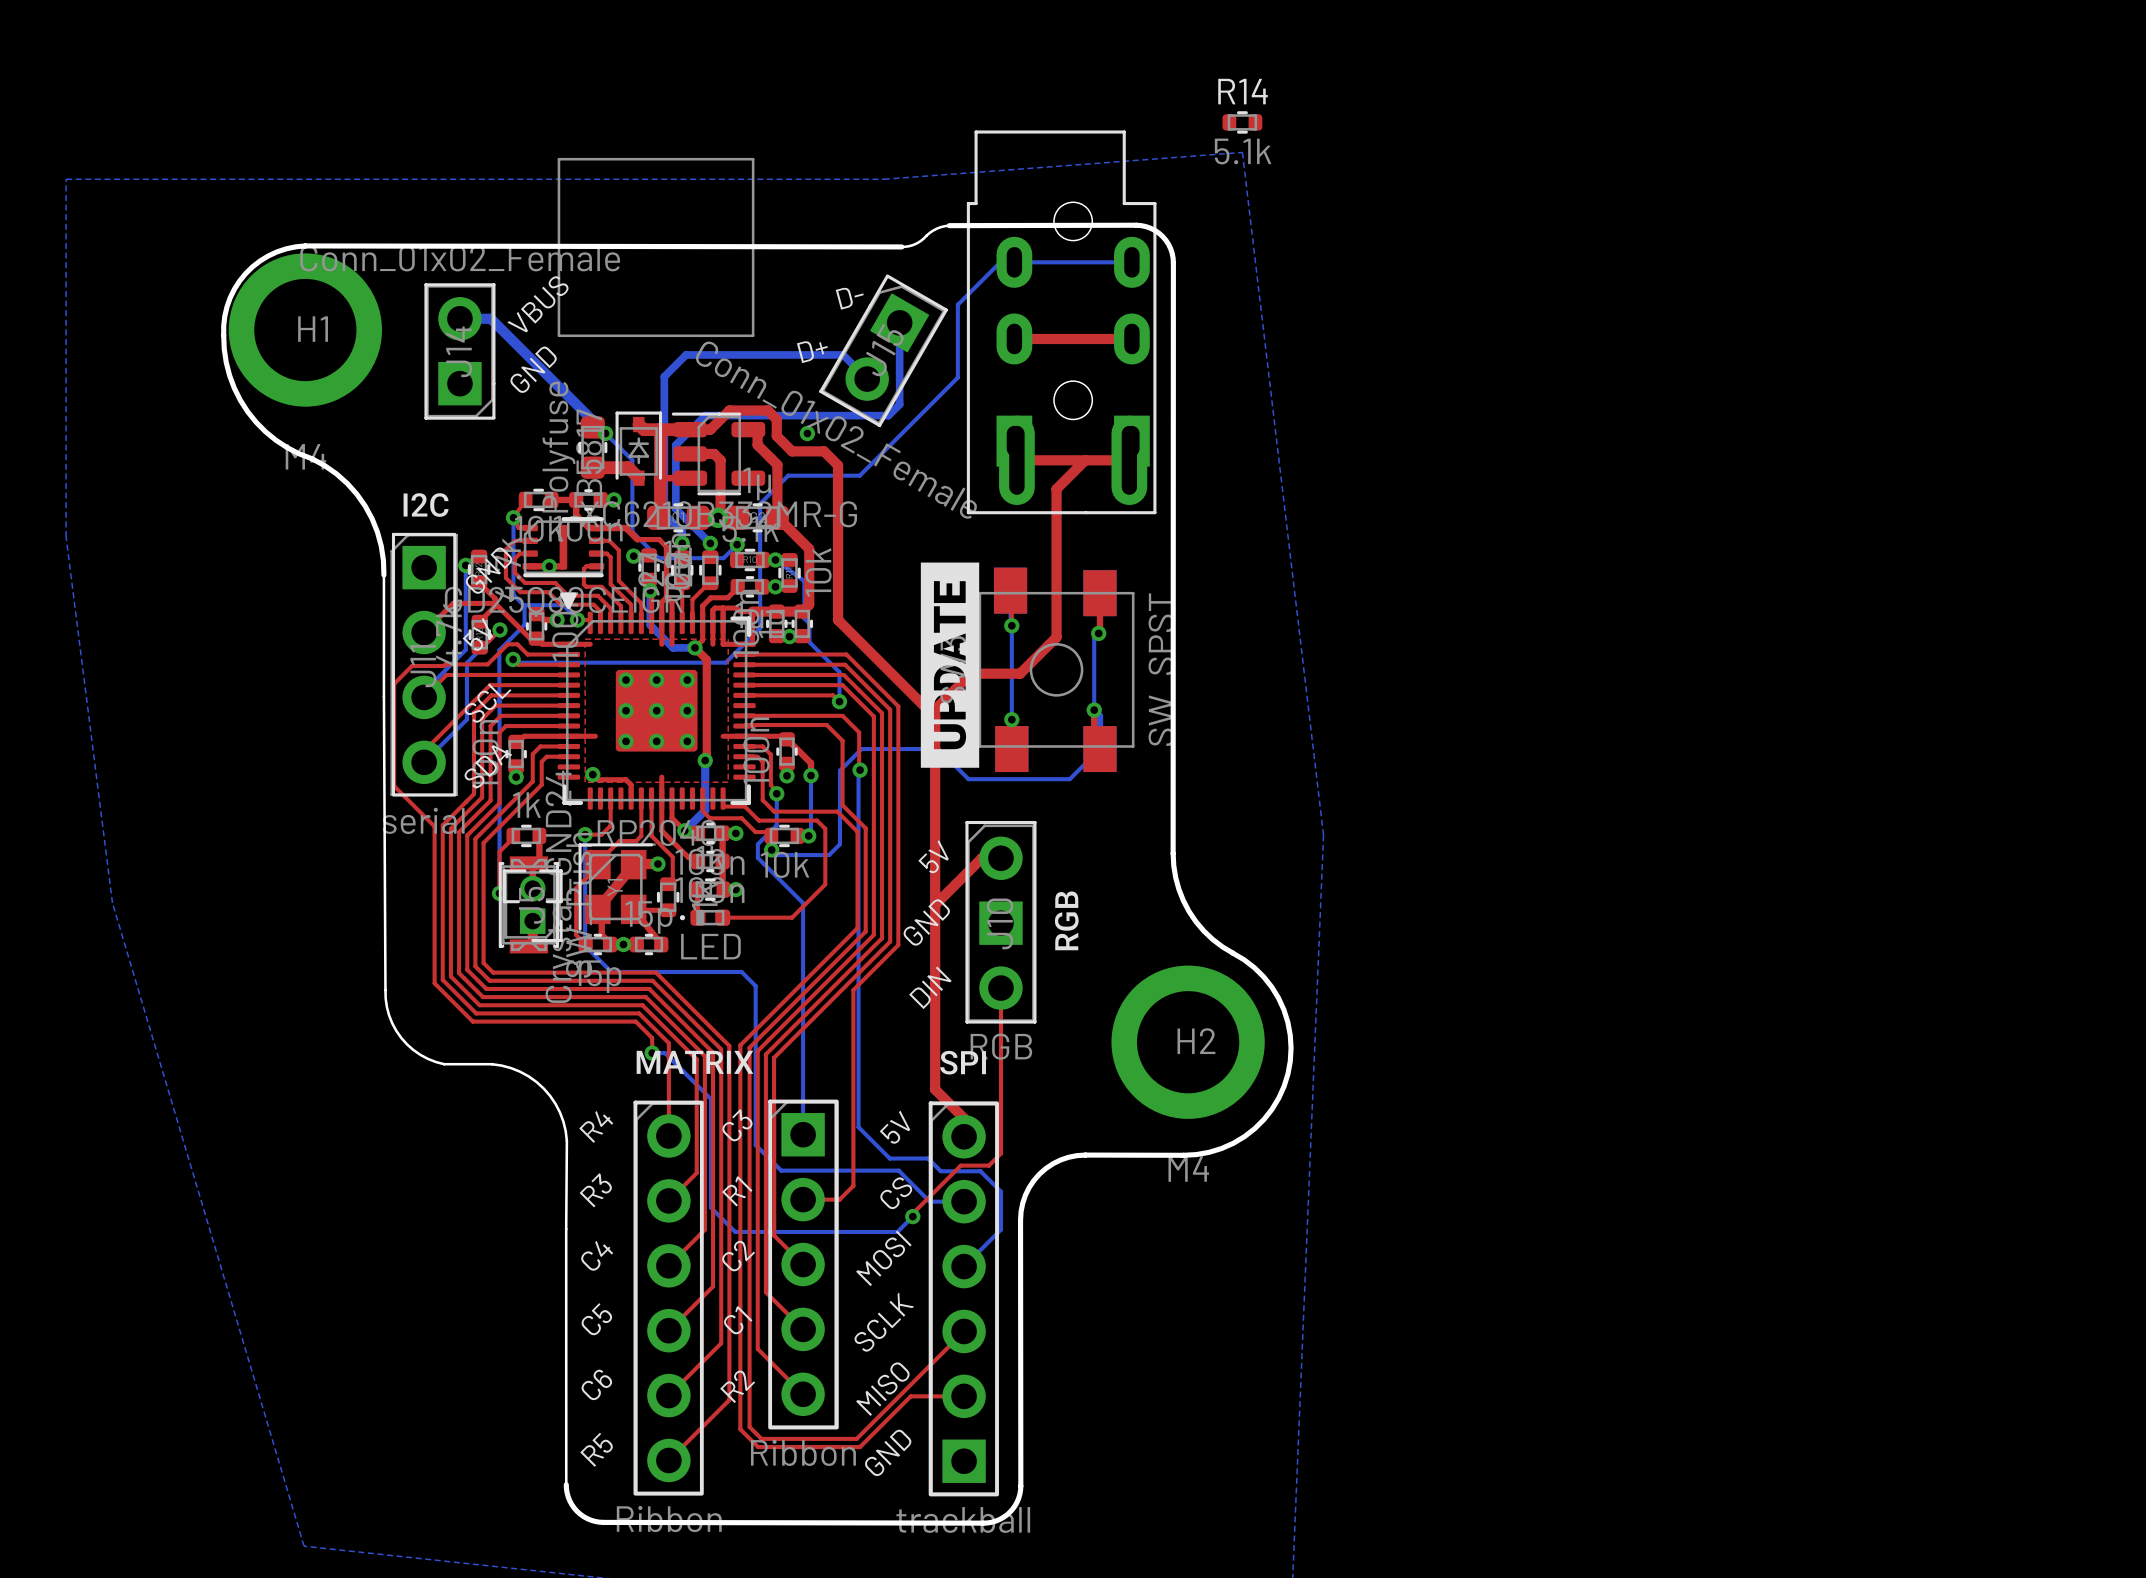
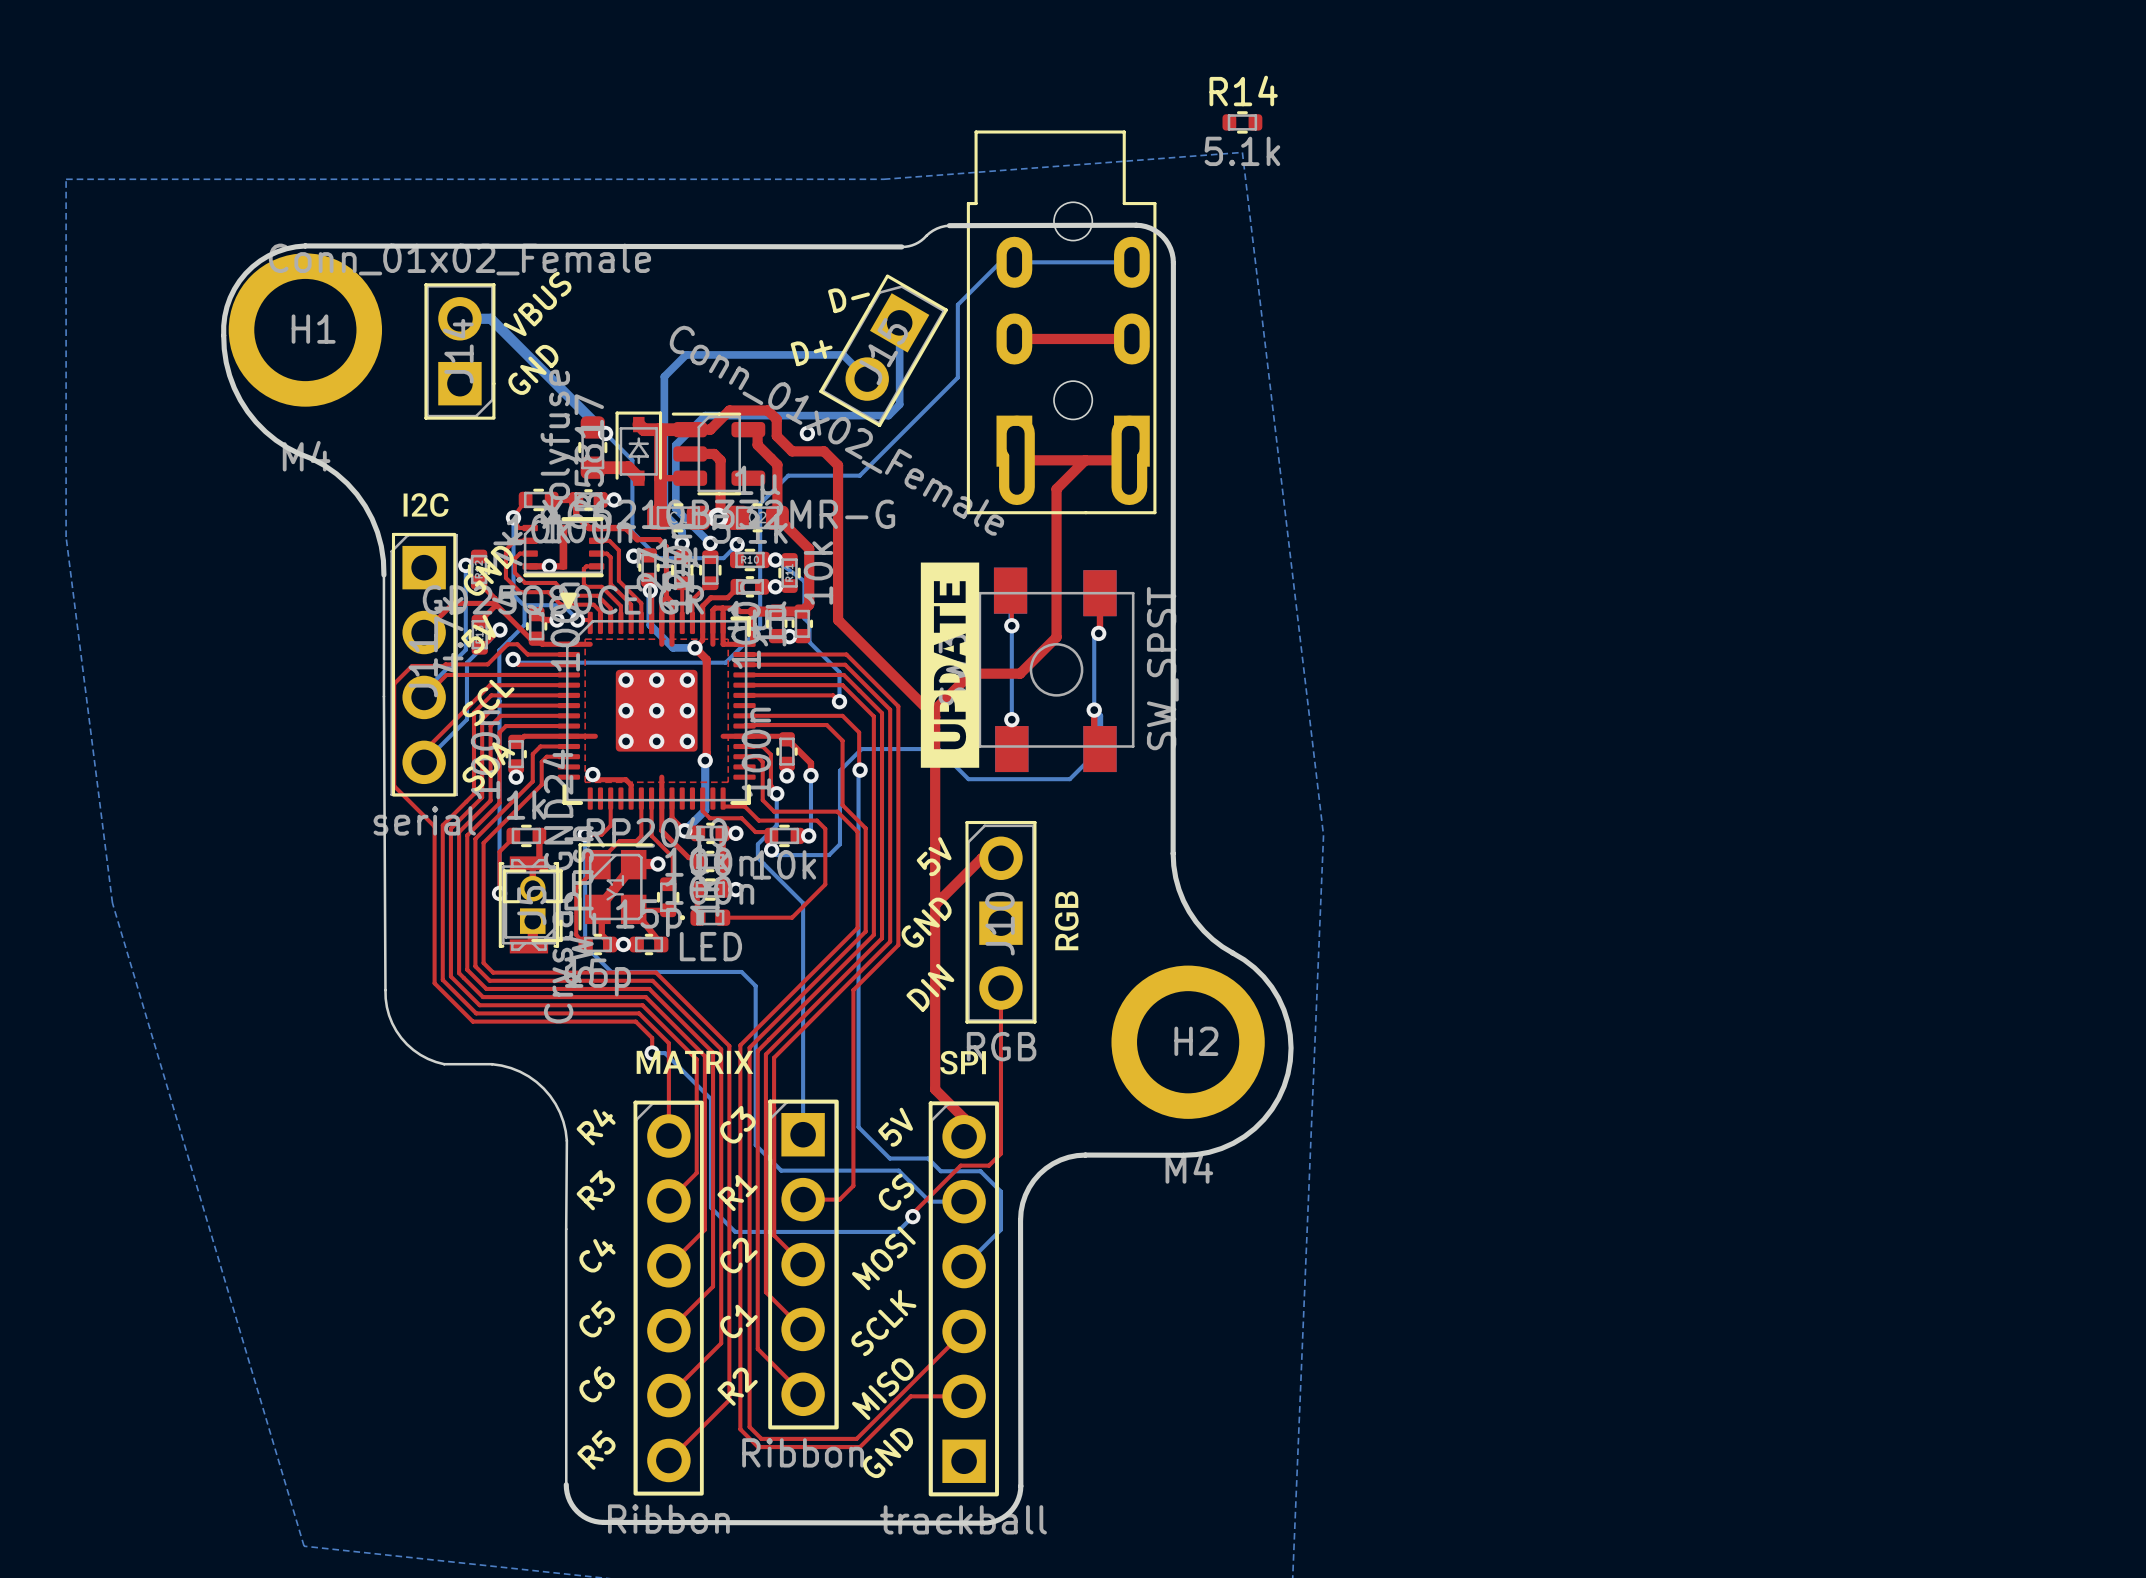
line: (558, 159) (558, 335) (753, 335) (753, 159) (558, 159) -> none

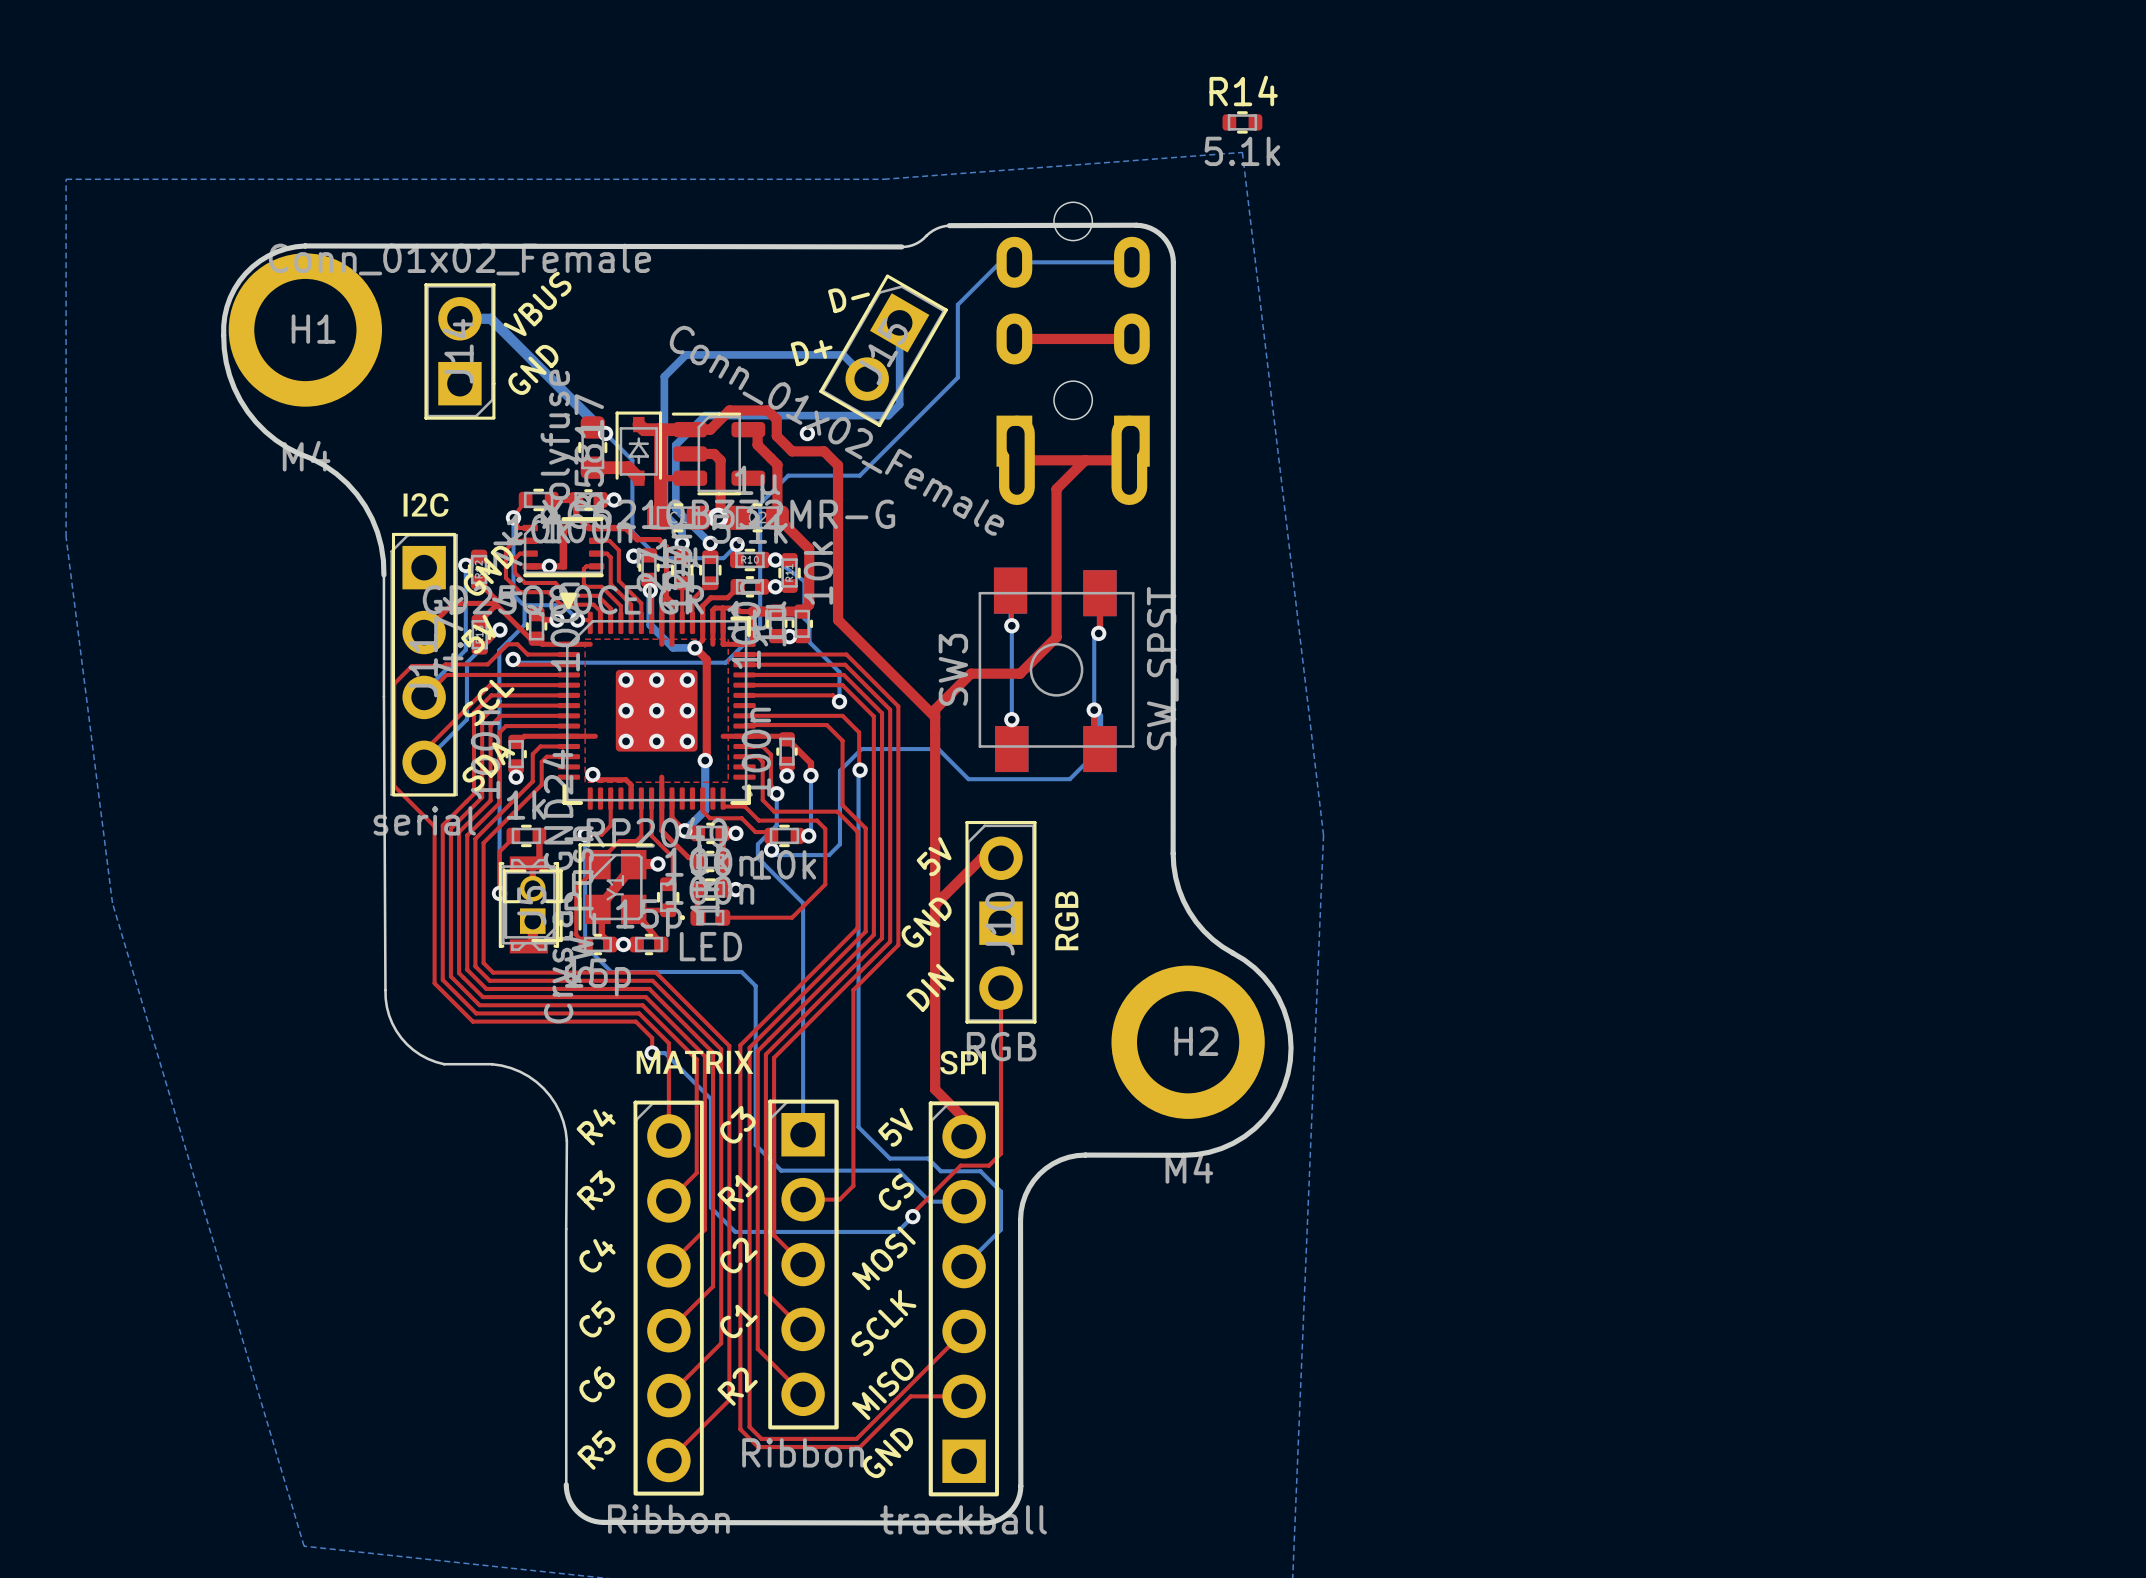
part: (1061, 322) -> none
drawing: [920, 562, 980, 768] -> none

